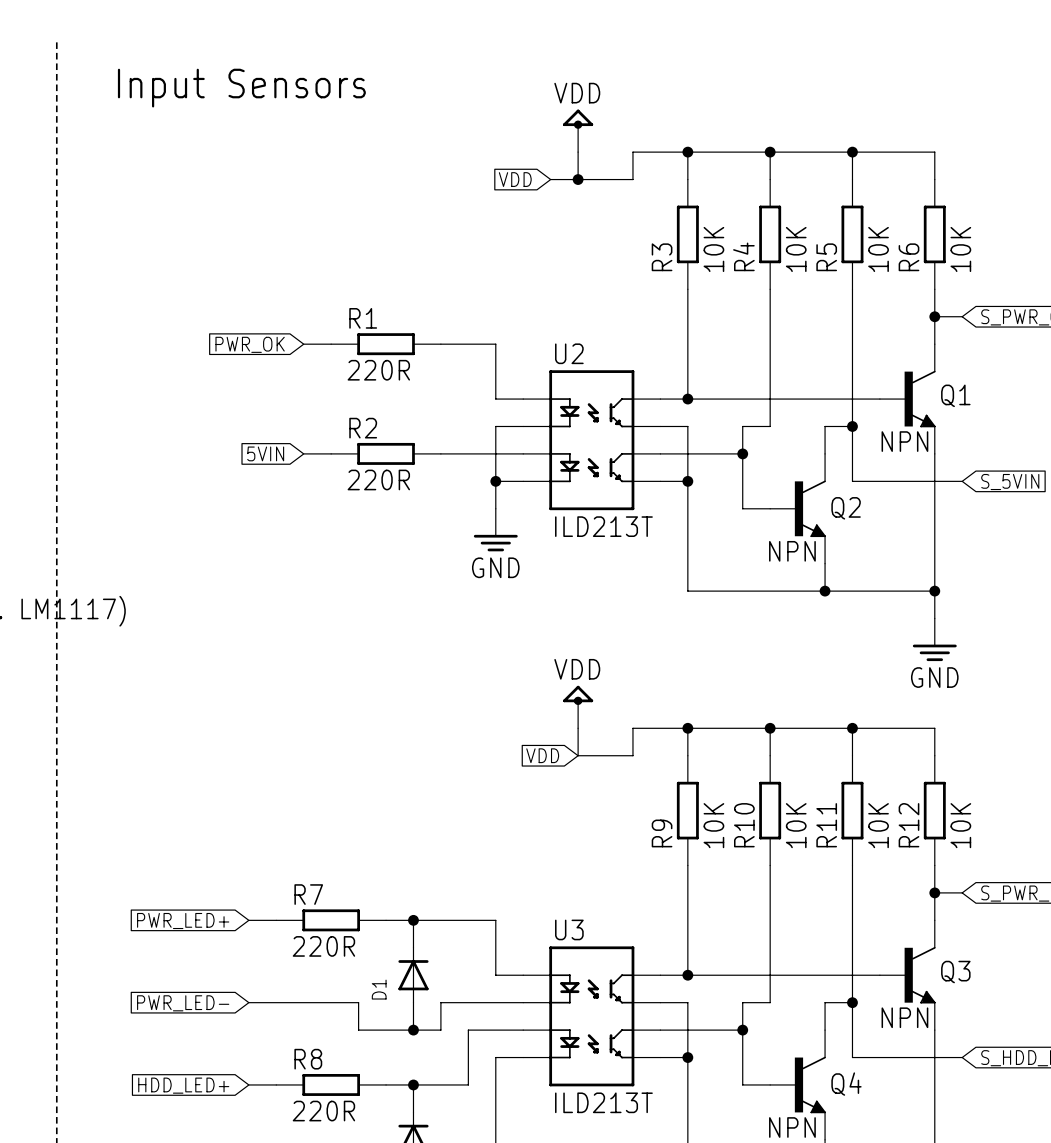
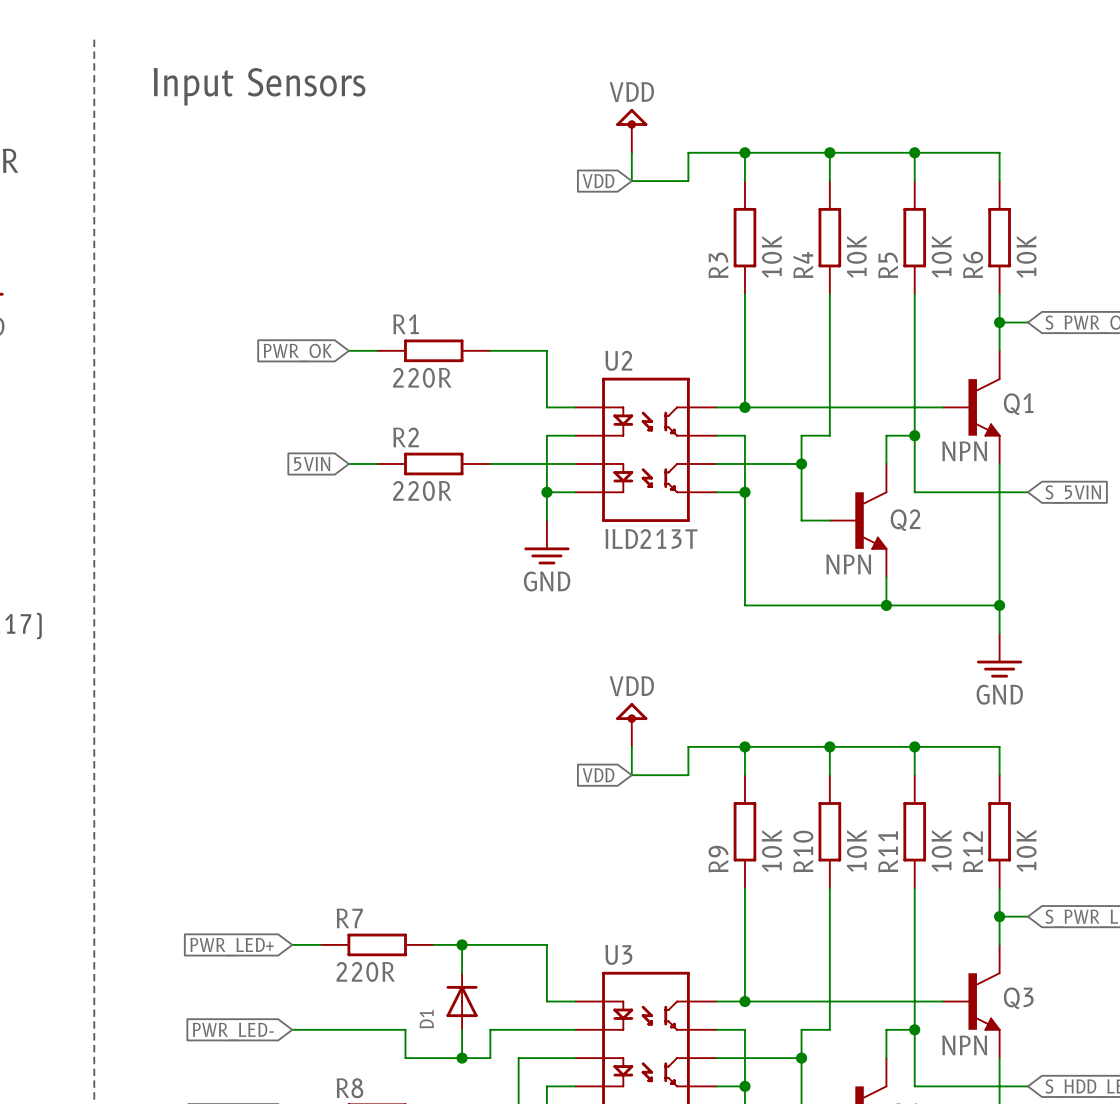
global label position: VDD (515, 179) -> VDD (598, 181)
wire: (550, 179) (578, 179) -> none
junction: (578, 179) -> none

